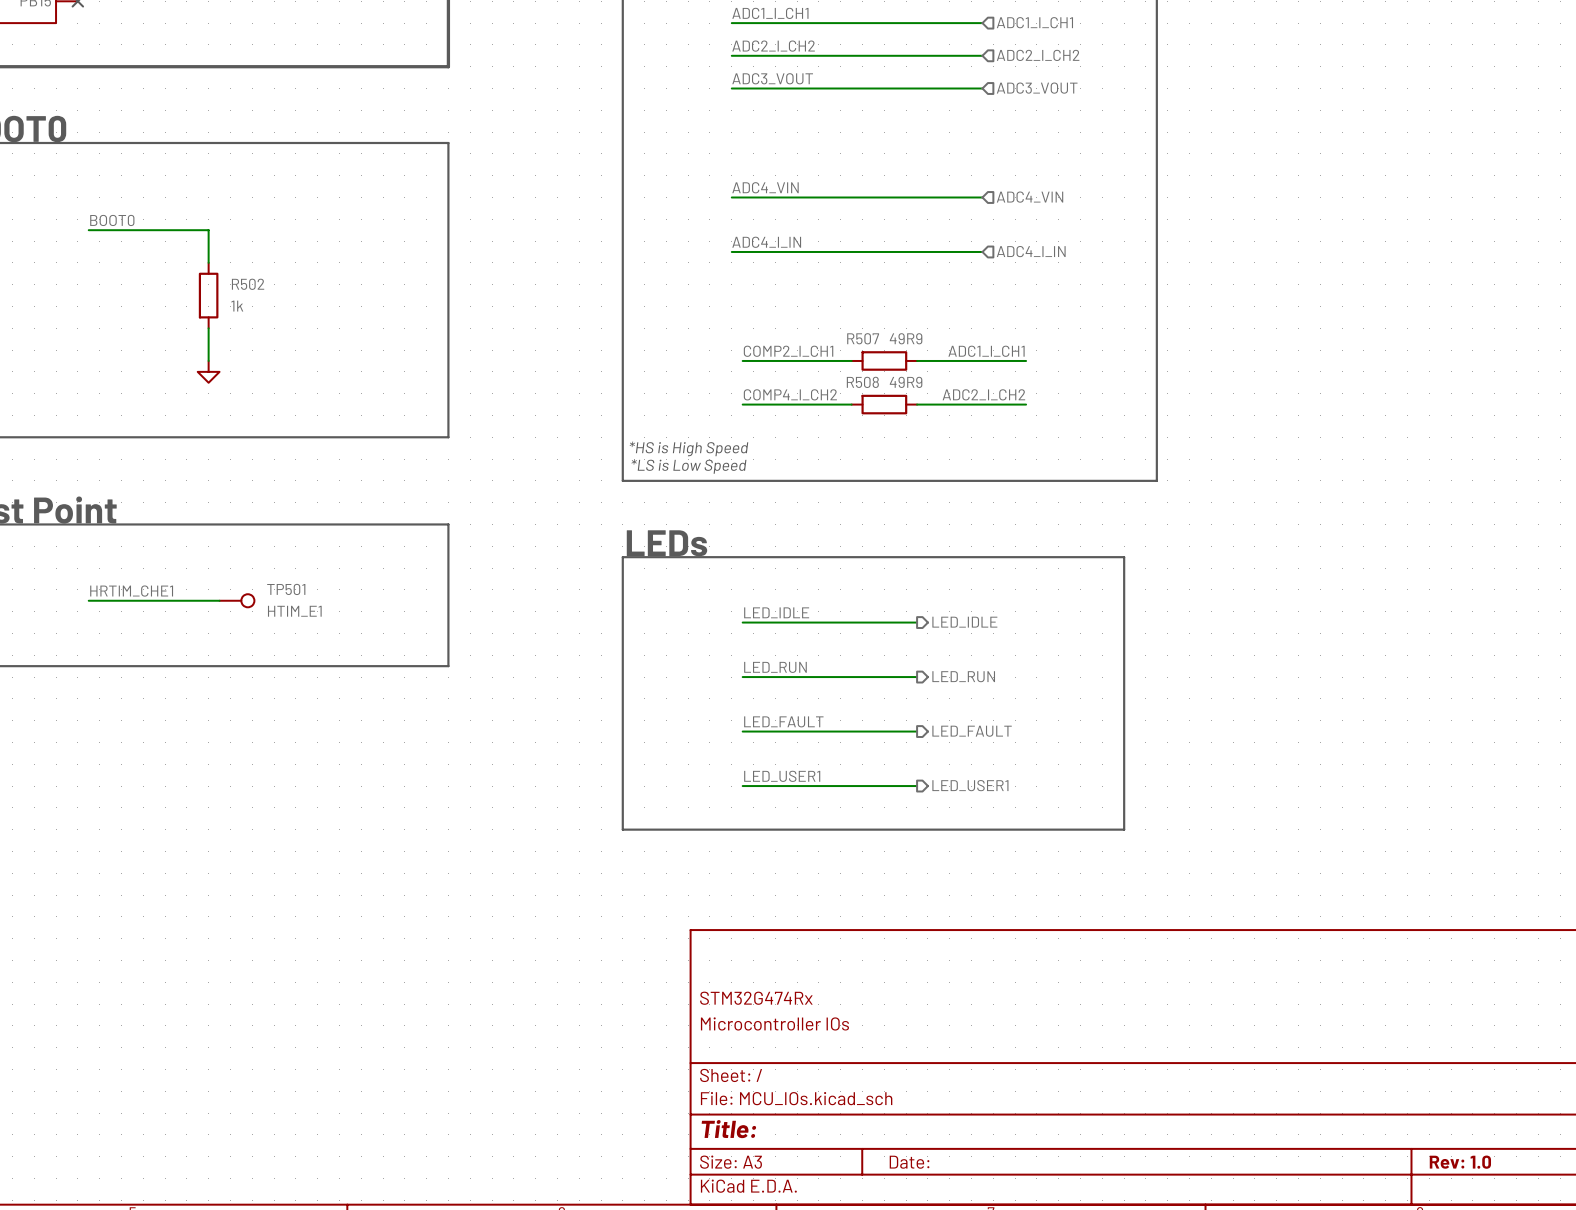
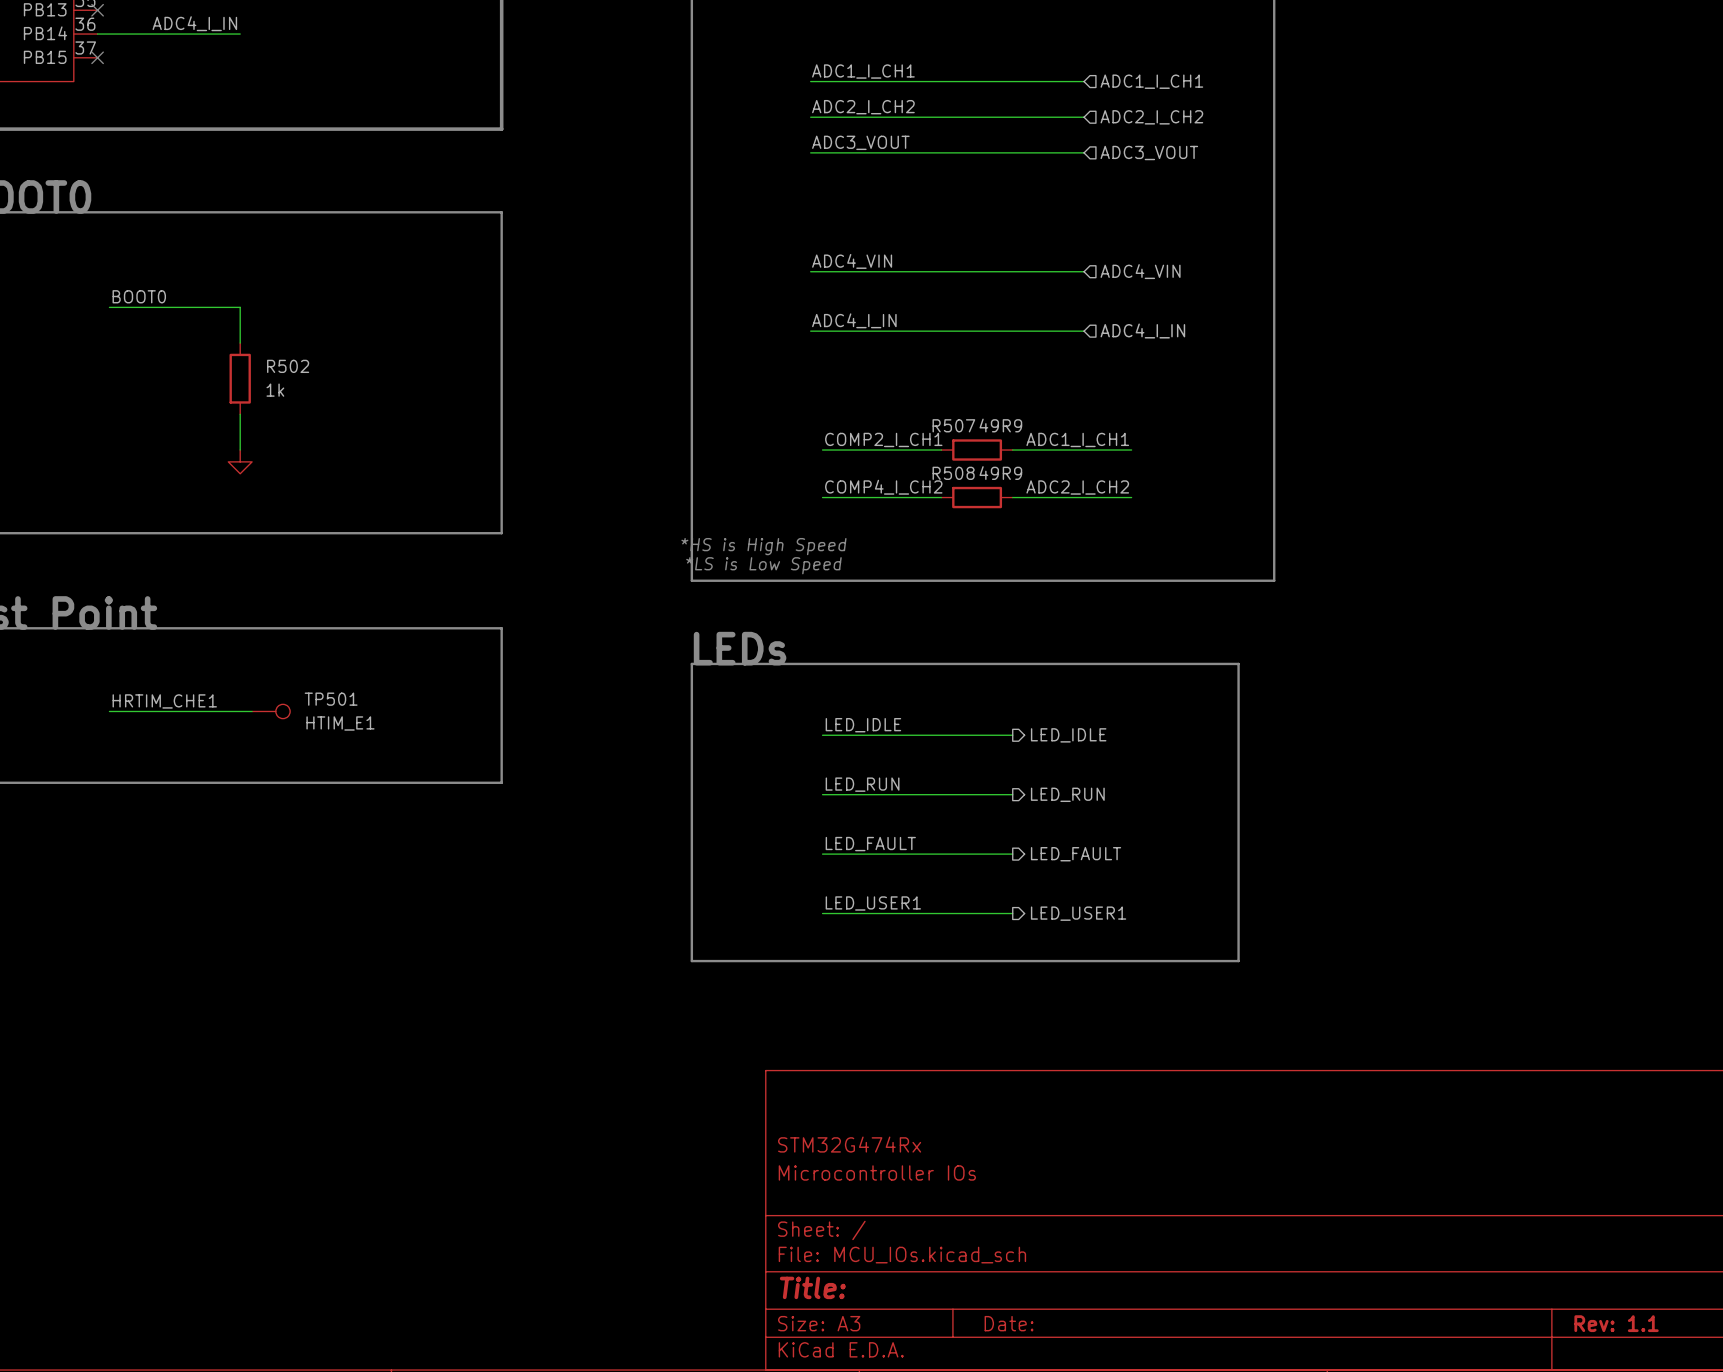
title block: Rev: 1.0 (1460, 1162) -> Rev: 1.1 (1616, 1323)

